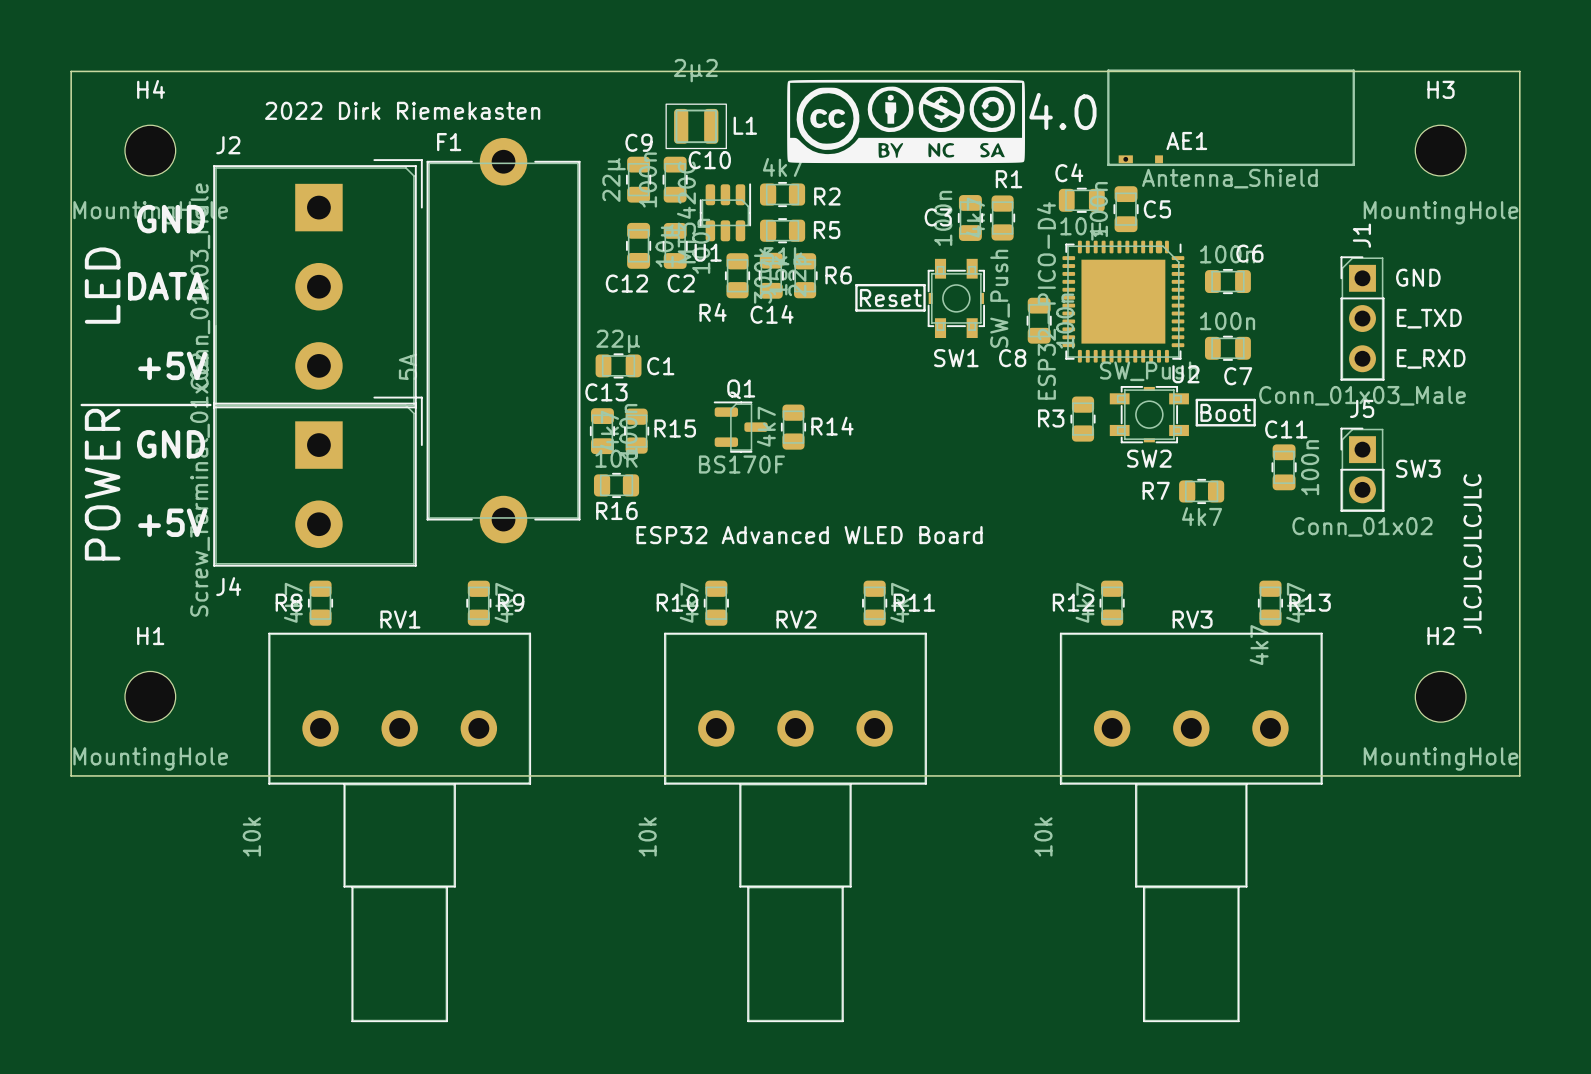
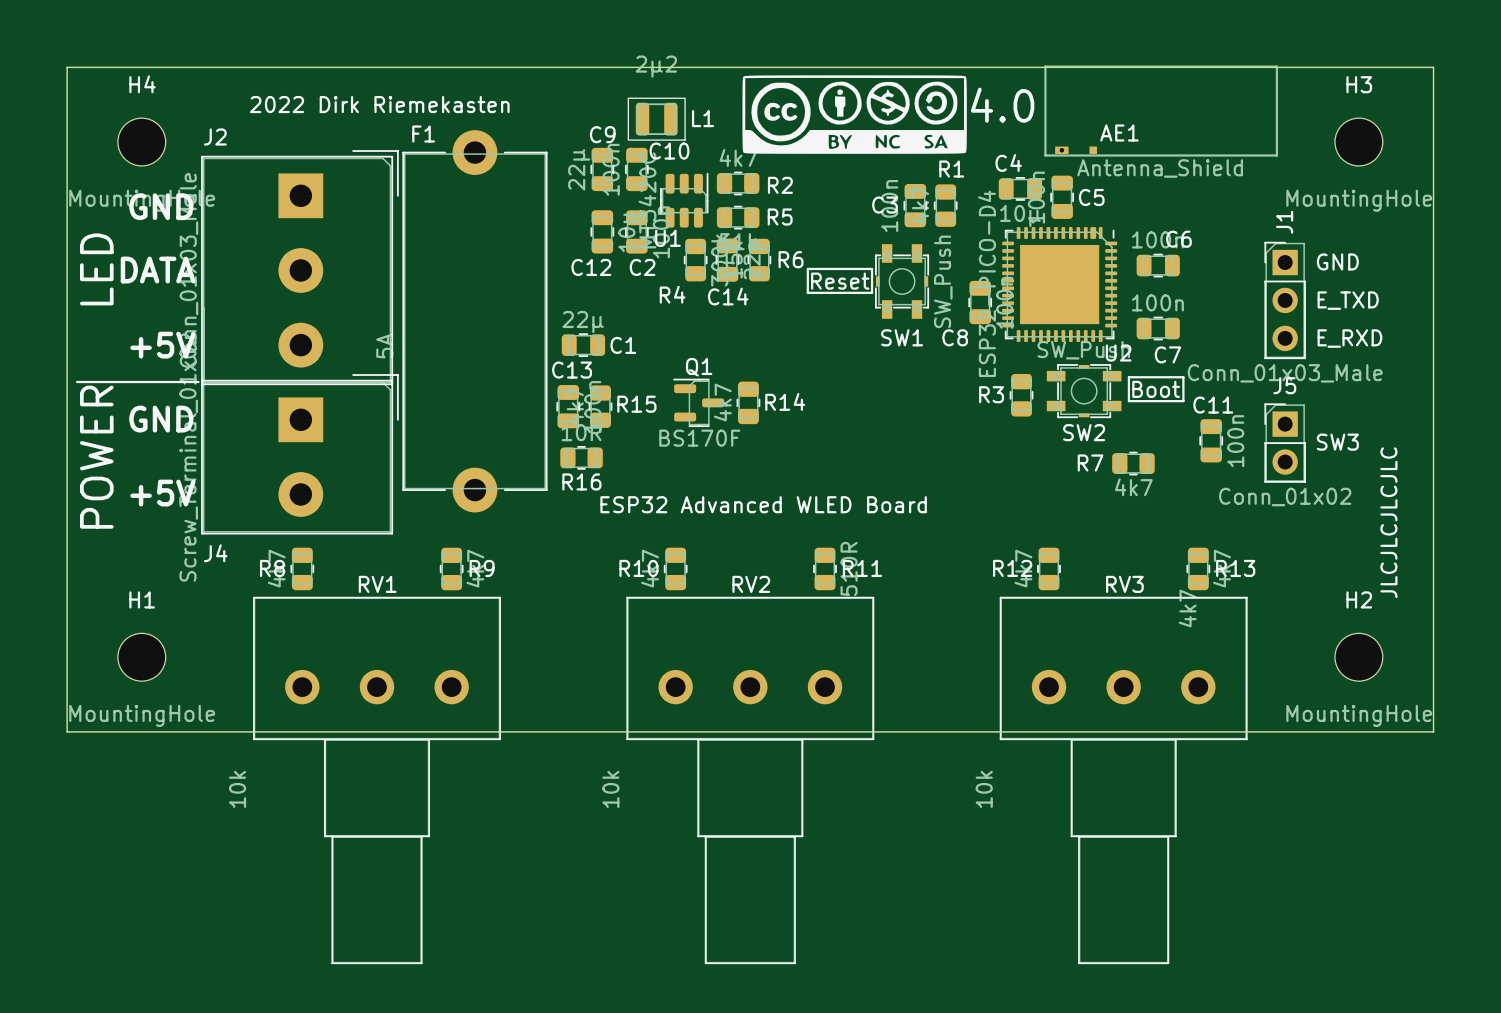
R11 value: 4k7 (899, 602) -> 510R (849, 568)

